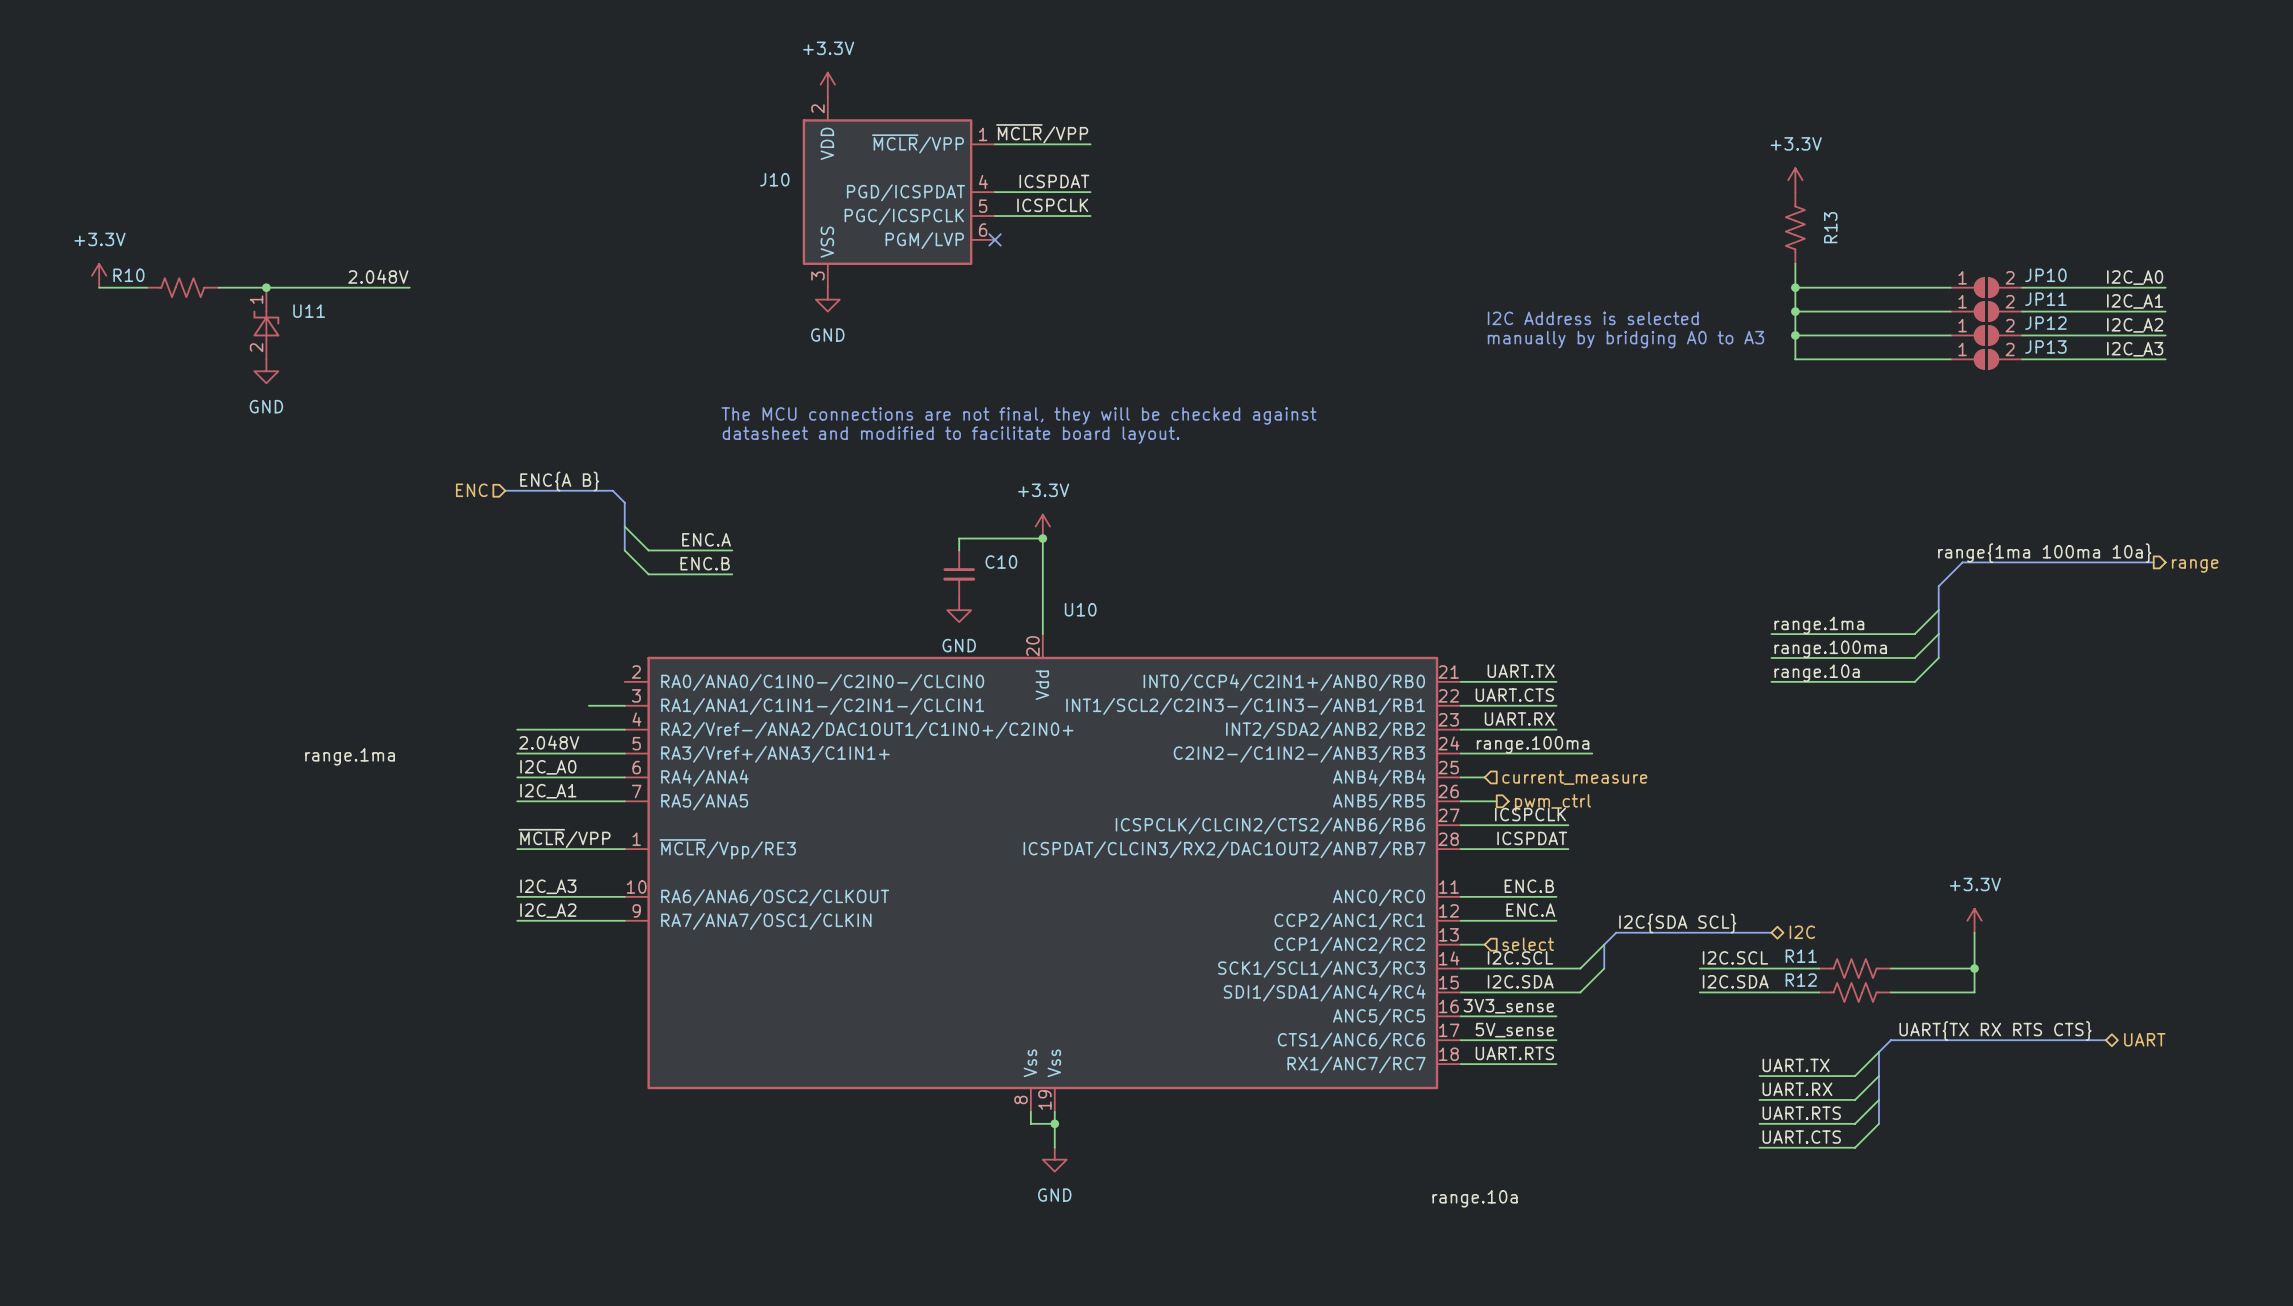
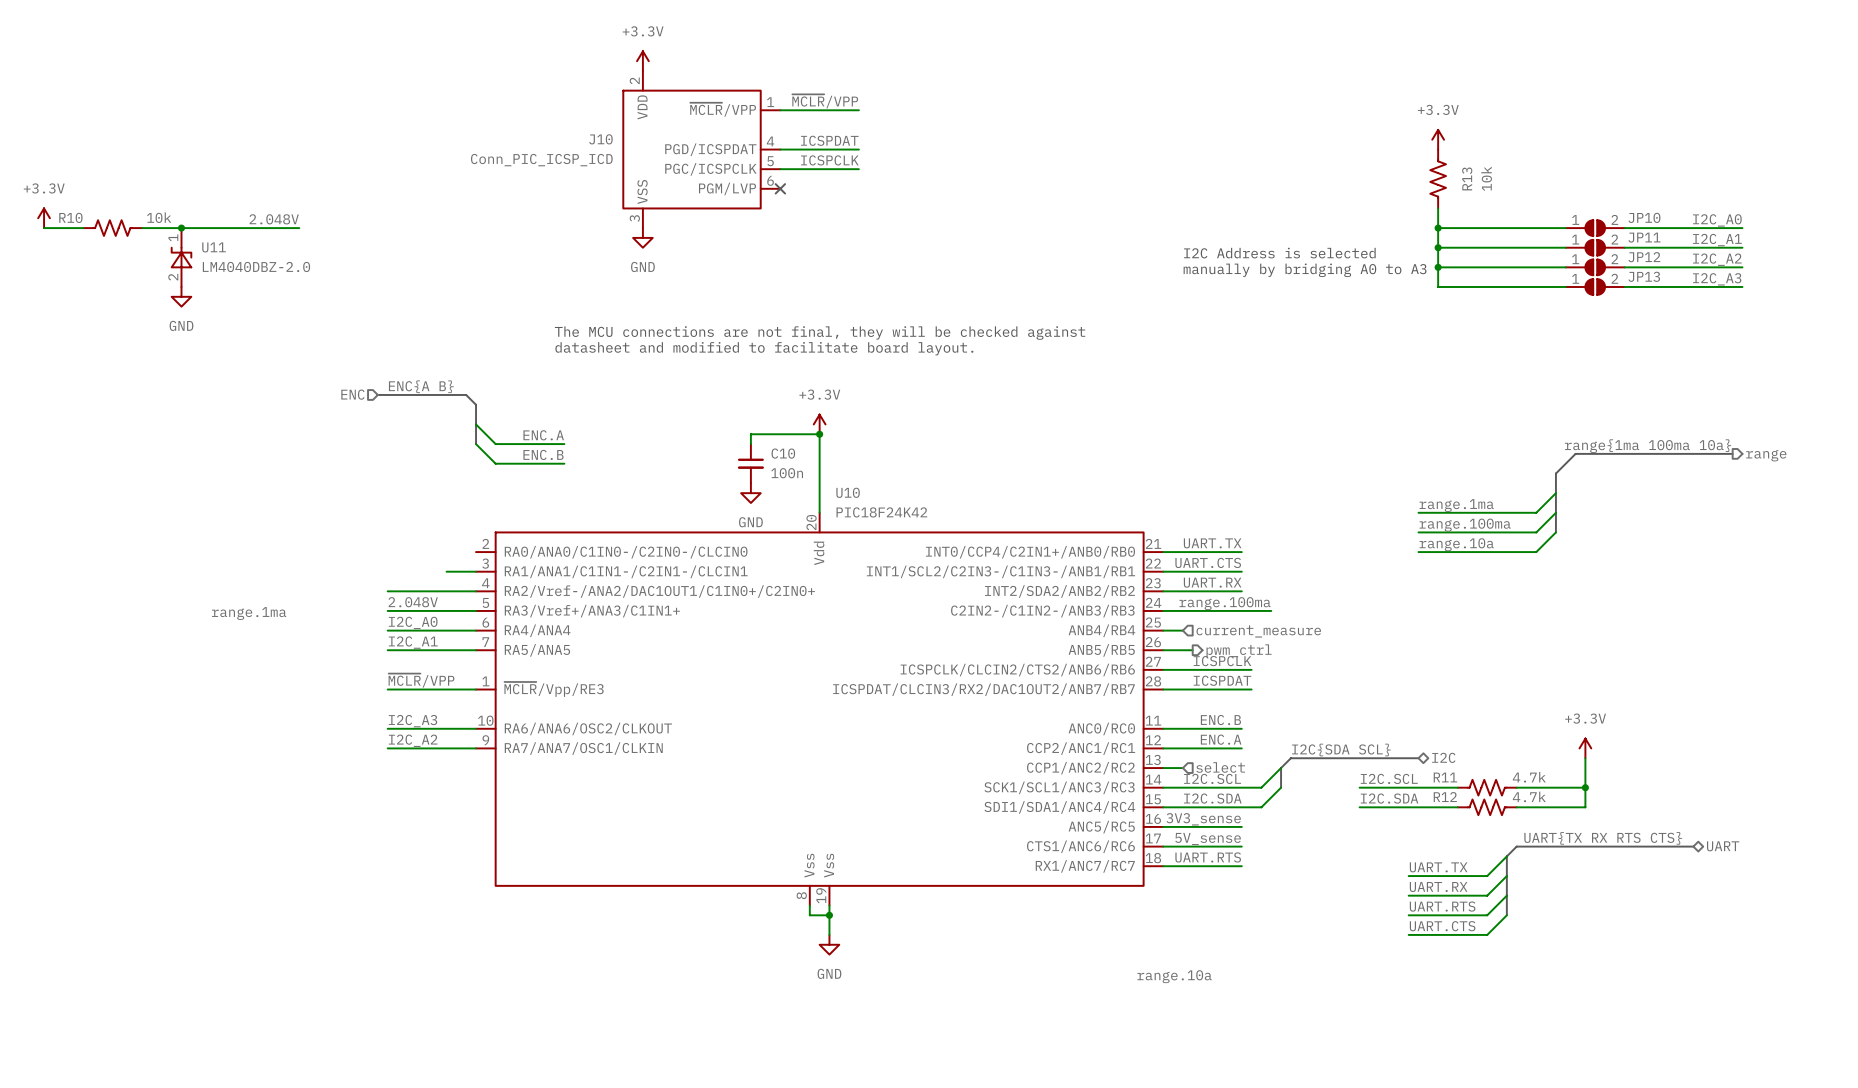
J10 value: none -> Conn_PIC_ICSP_ICD (541, 160)
R13 value: none -> 10k (1486, 178)
R10 value: none -> 10k (159, 217)
U11 value: none -> LM4040DBZ-2.0 (256, 266)
C10 value: none -> 100n (787, 473)
U10 value: none -> PIC18F24K42 (881, 512)
R11 value: none -> 4.7k (1529, 777)
R12 value: none -> 4.7k (1529, 796)

